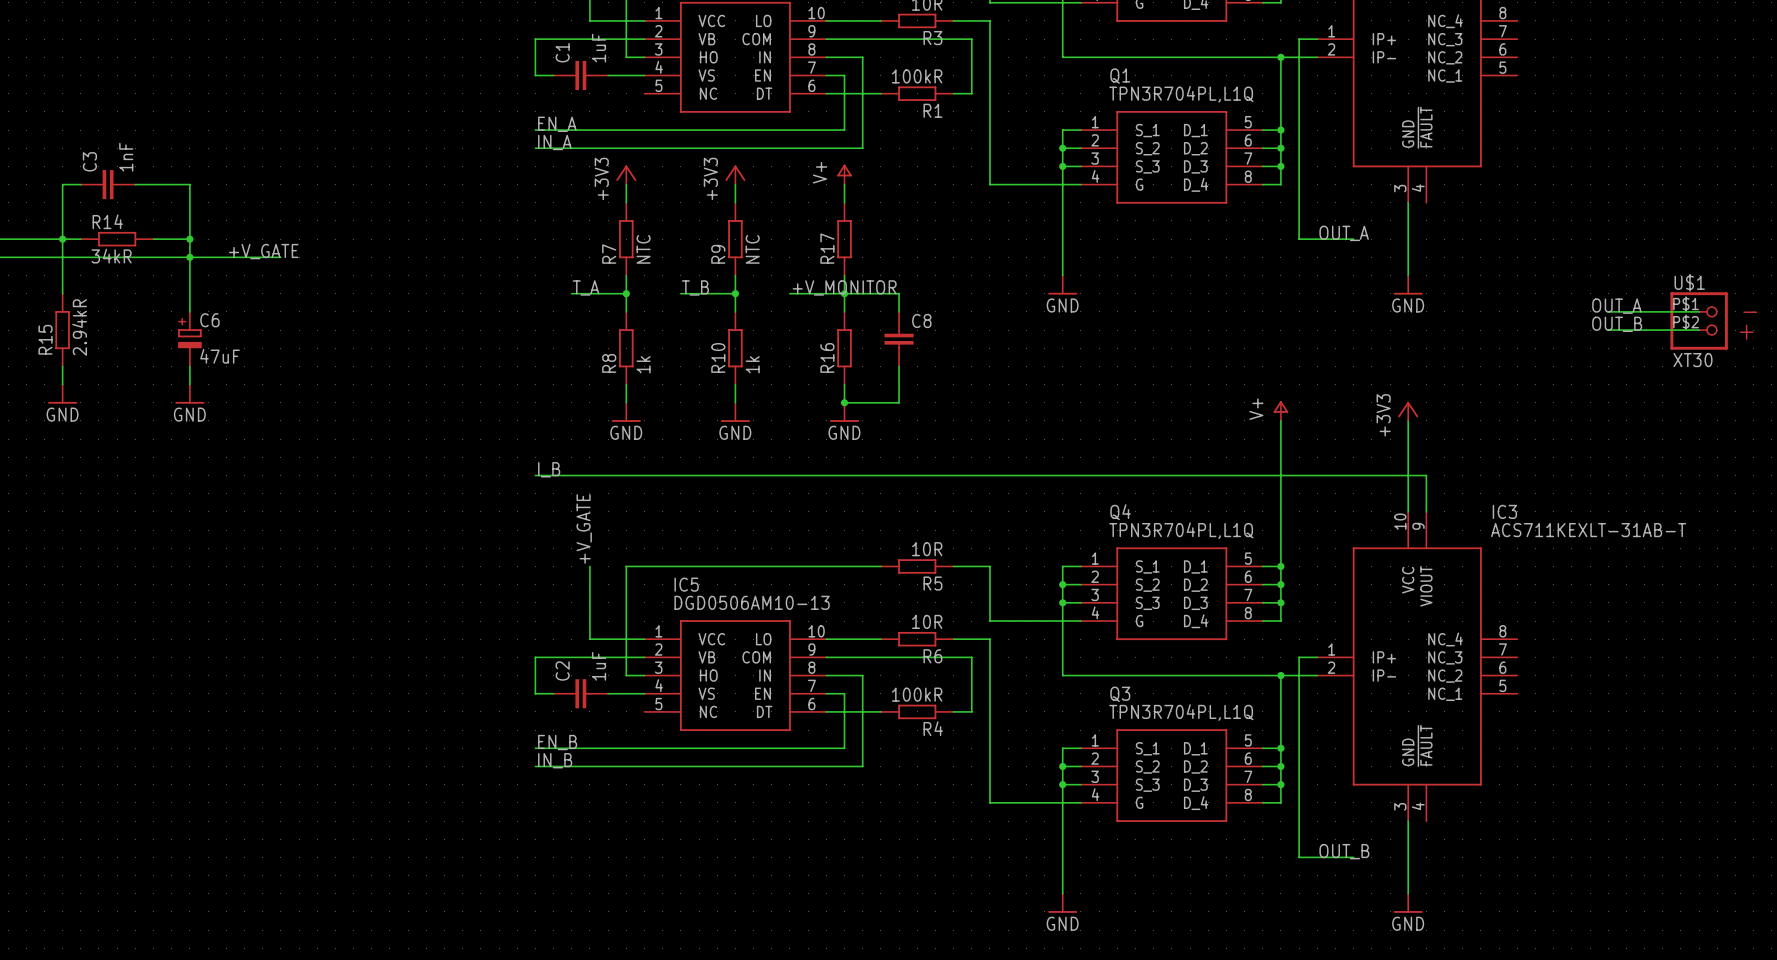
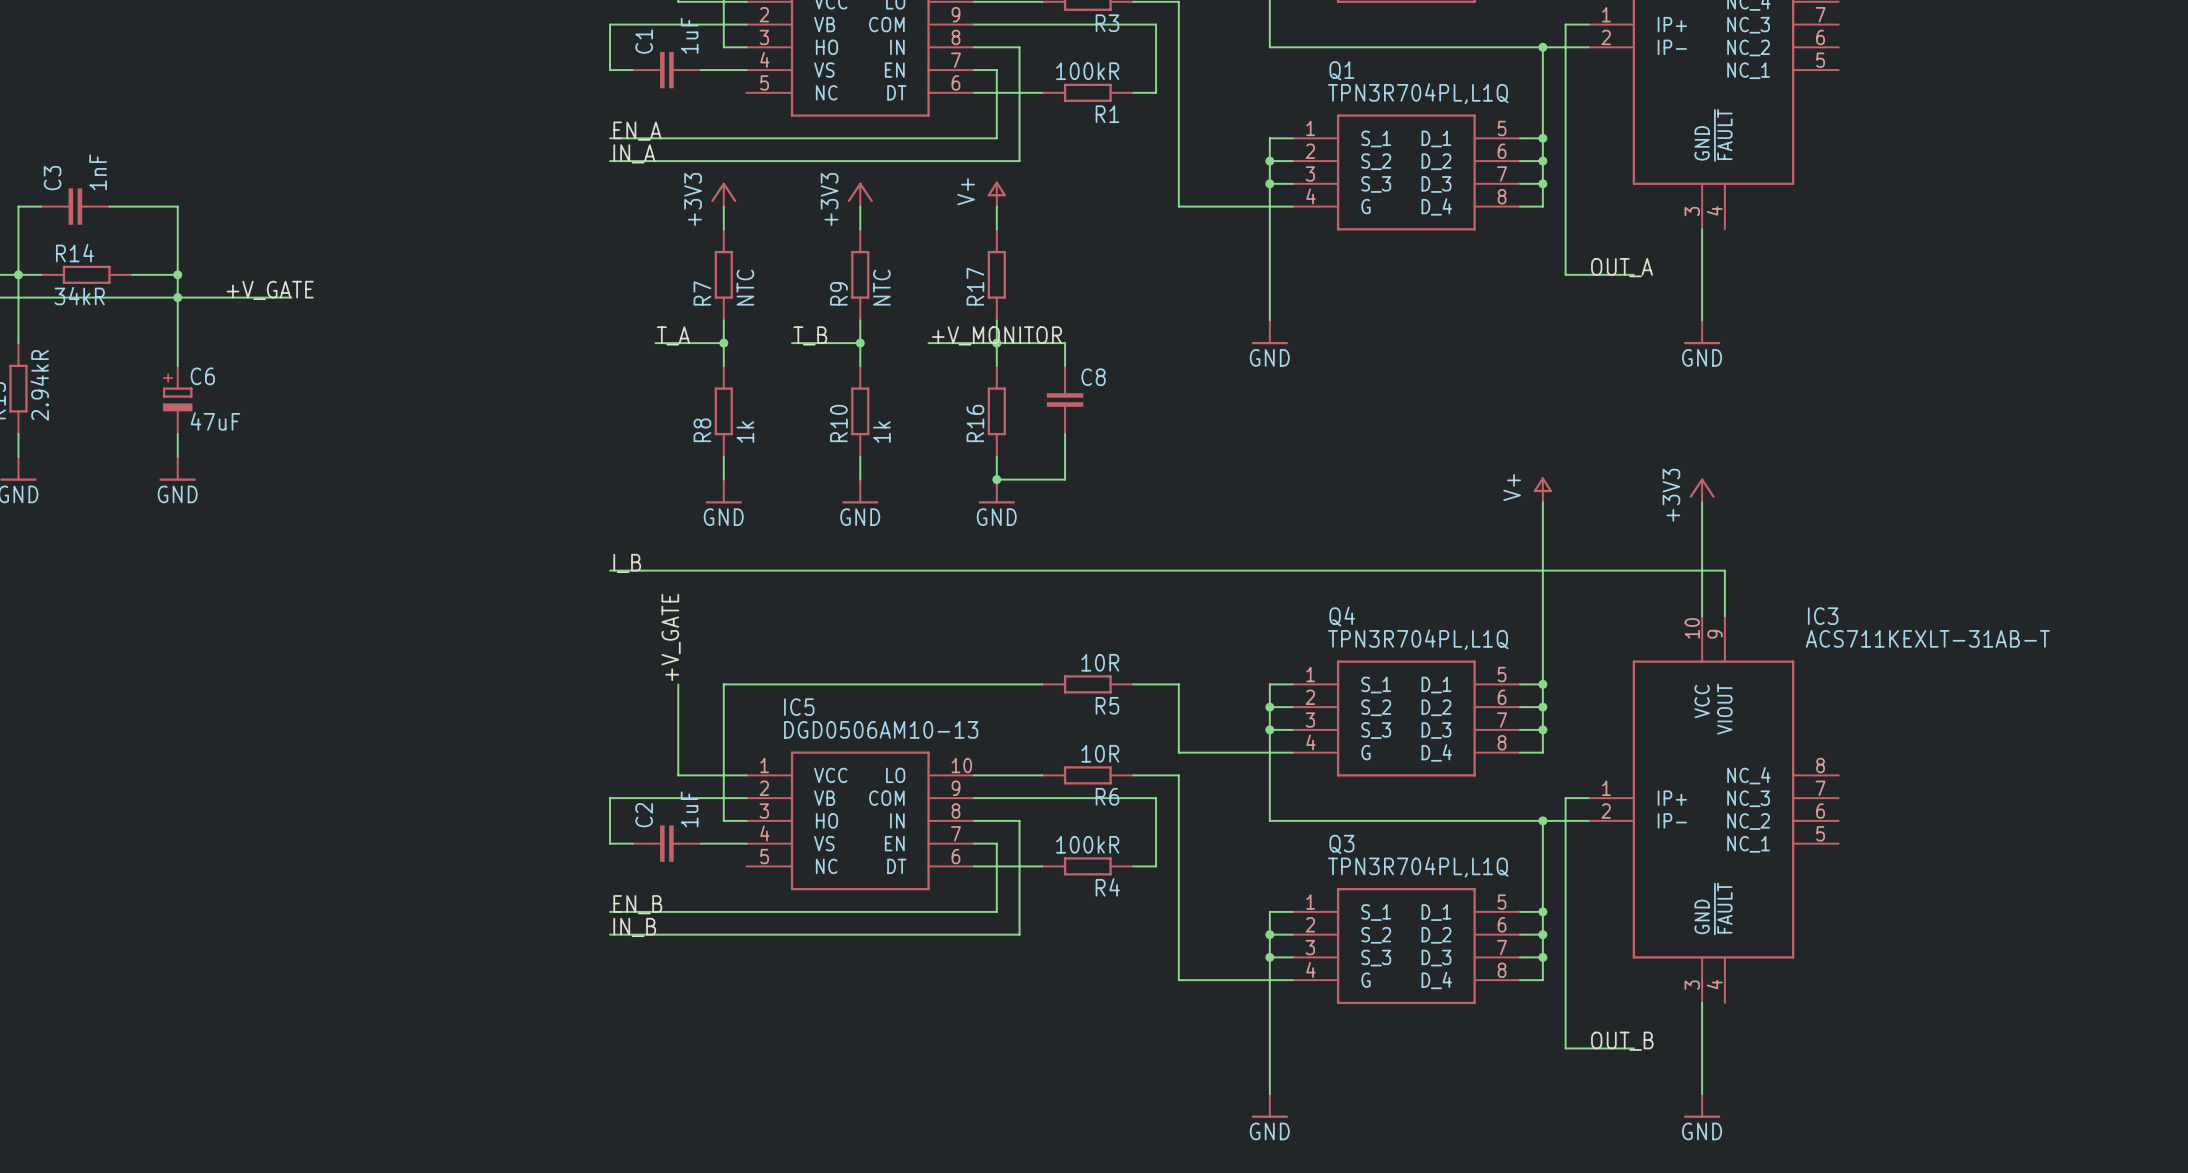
label: OUT_A (1616, 306) -> none
wire: (1608, 311) (1699, 311) -> none
U$1: XT30 (1699, 320) -> none
label: OUT_B (1617, 324) -> none
wire: (1608, 330) (1699, 330) -> none

